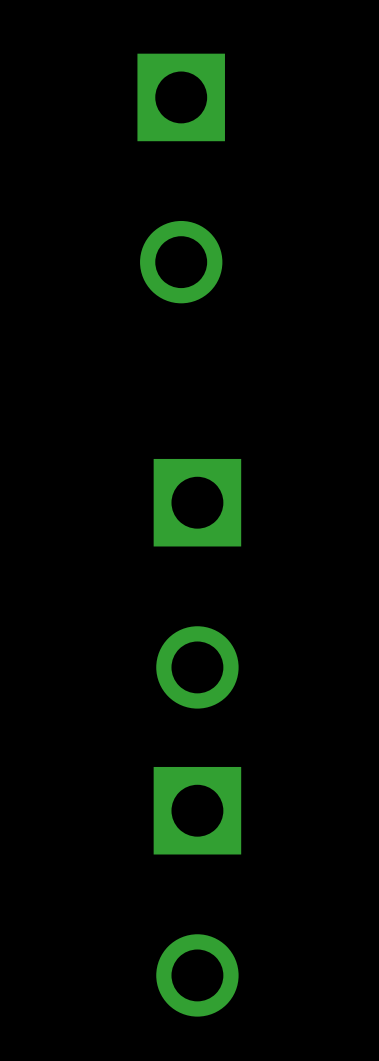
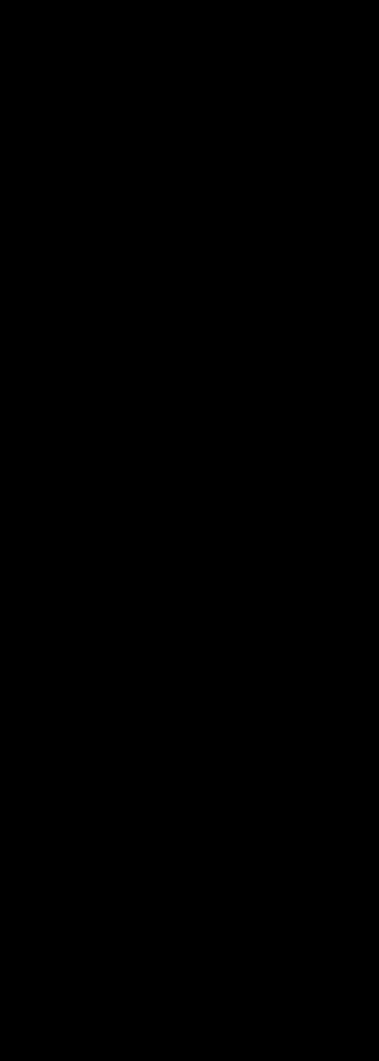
part: (181, 178) -> none
part: (197, 583) -> none
part: (197, 891) -> none

